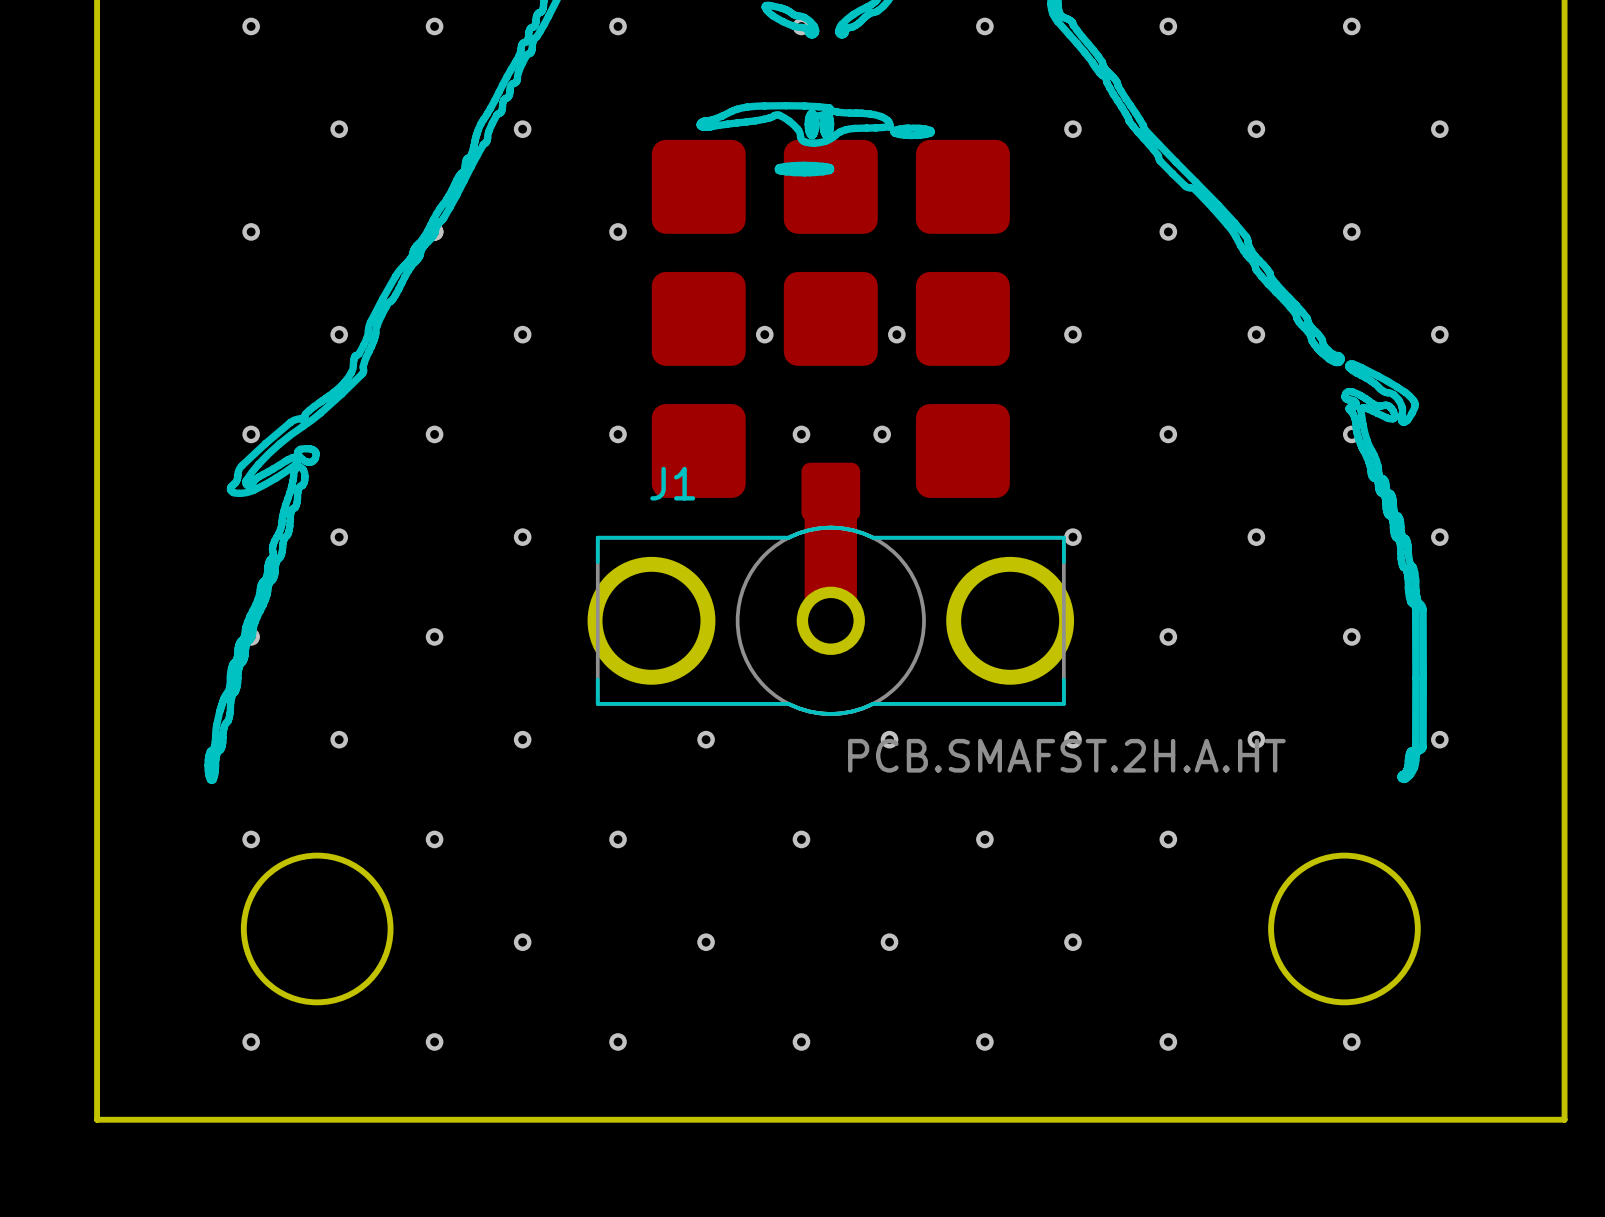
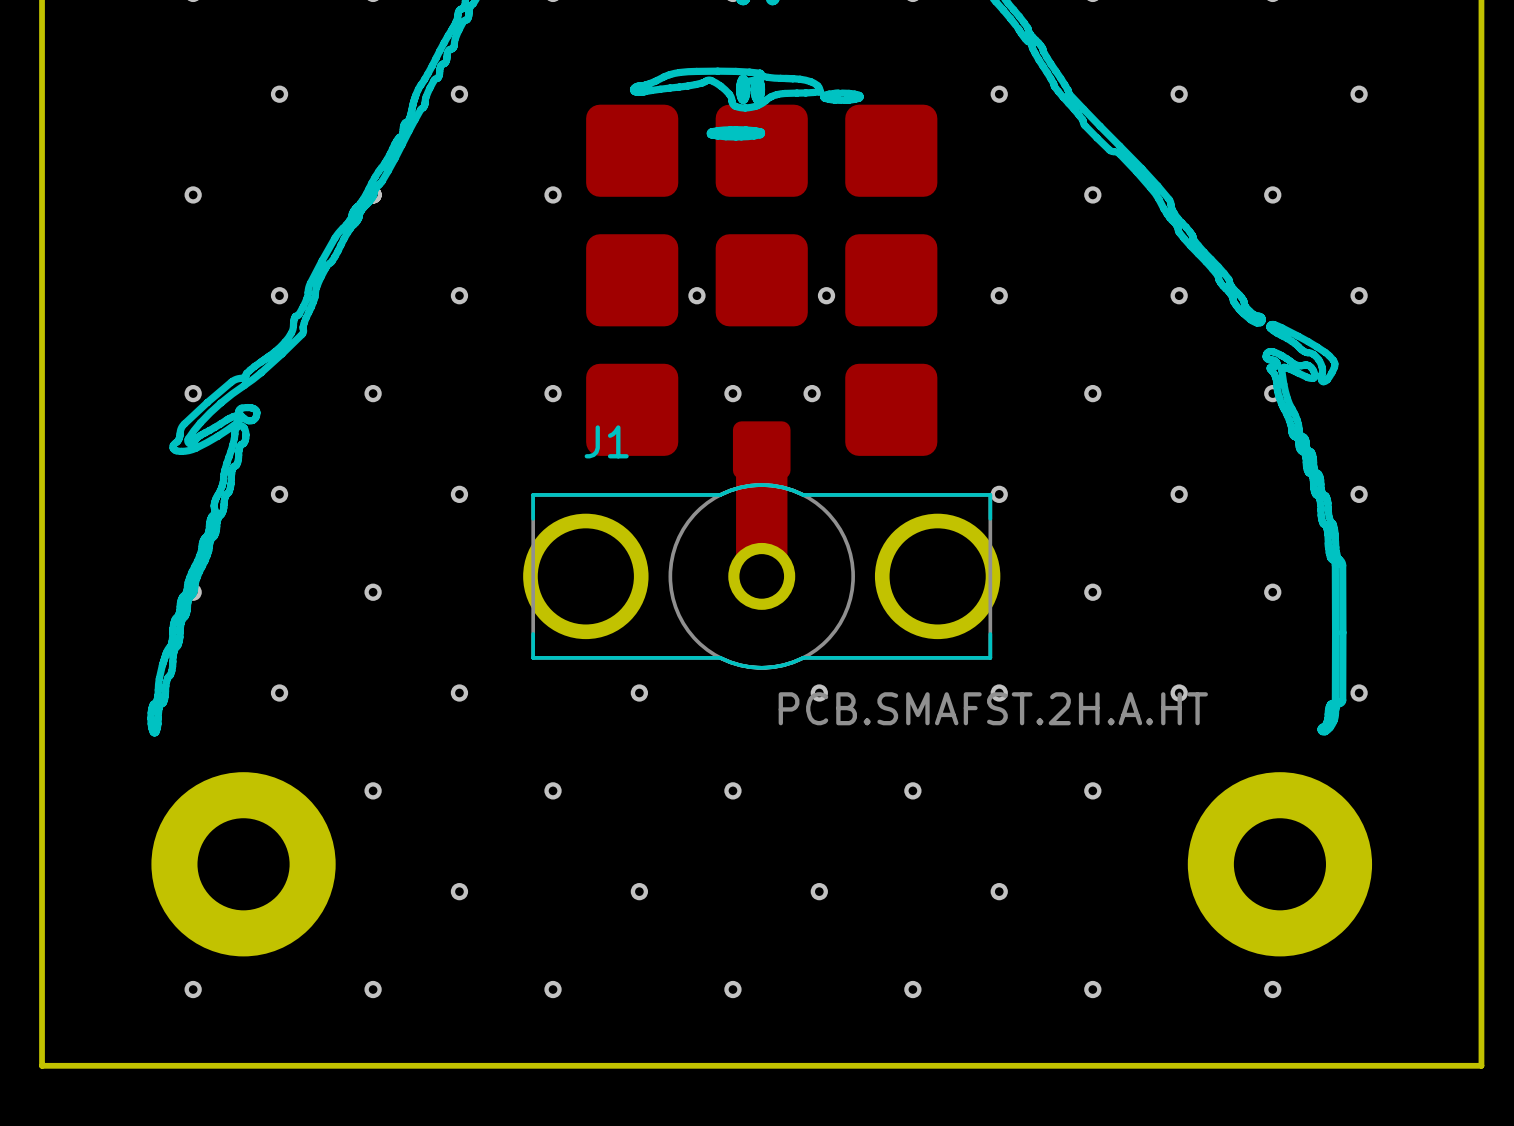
via: (251, 839) -> none
round board edge: [240, 852, 394, 1006] -> none
round board edge: [1268, 852, 1421, 1006] -> none
part: none -> (243, 864)
part: none -> (1279, 864)

